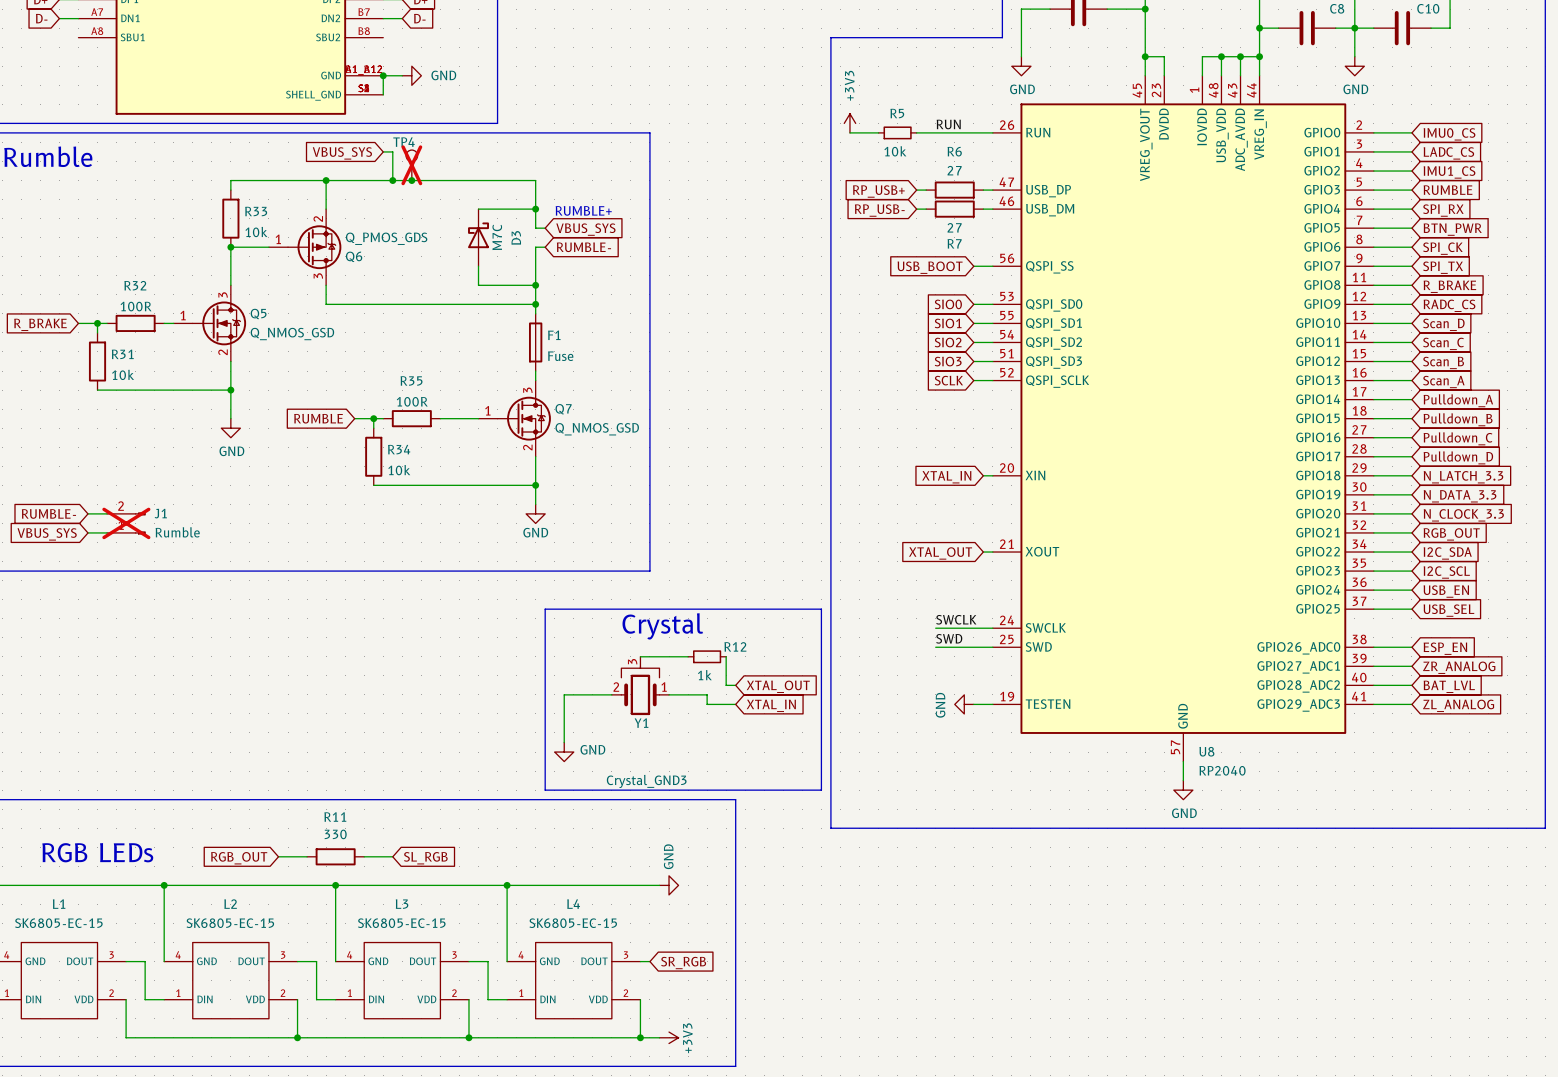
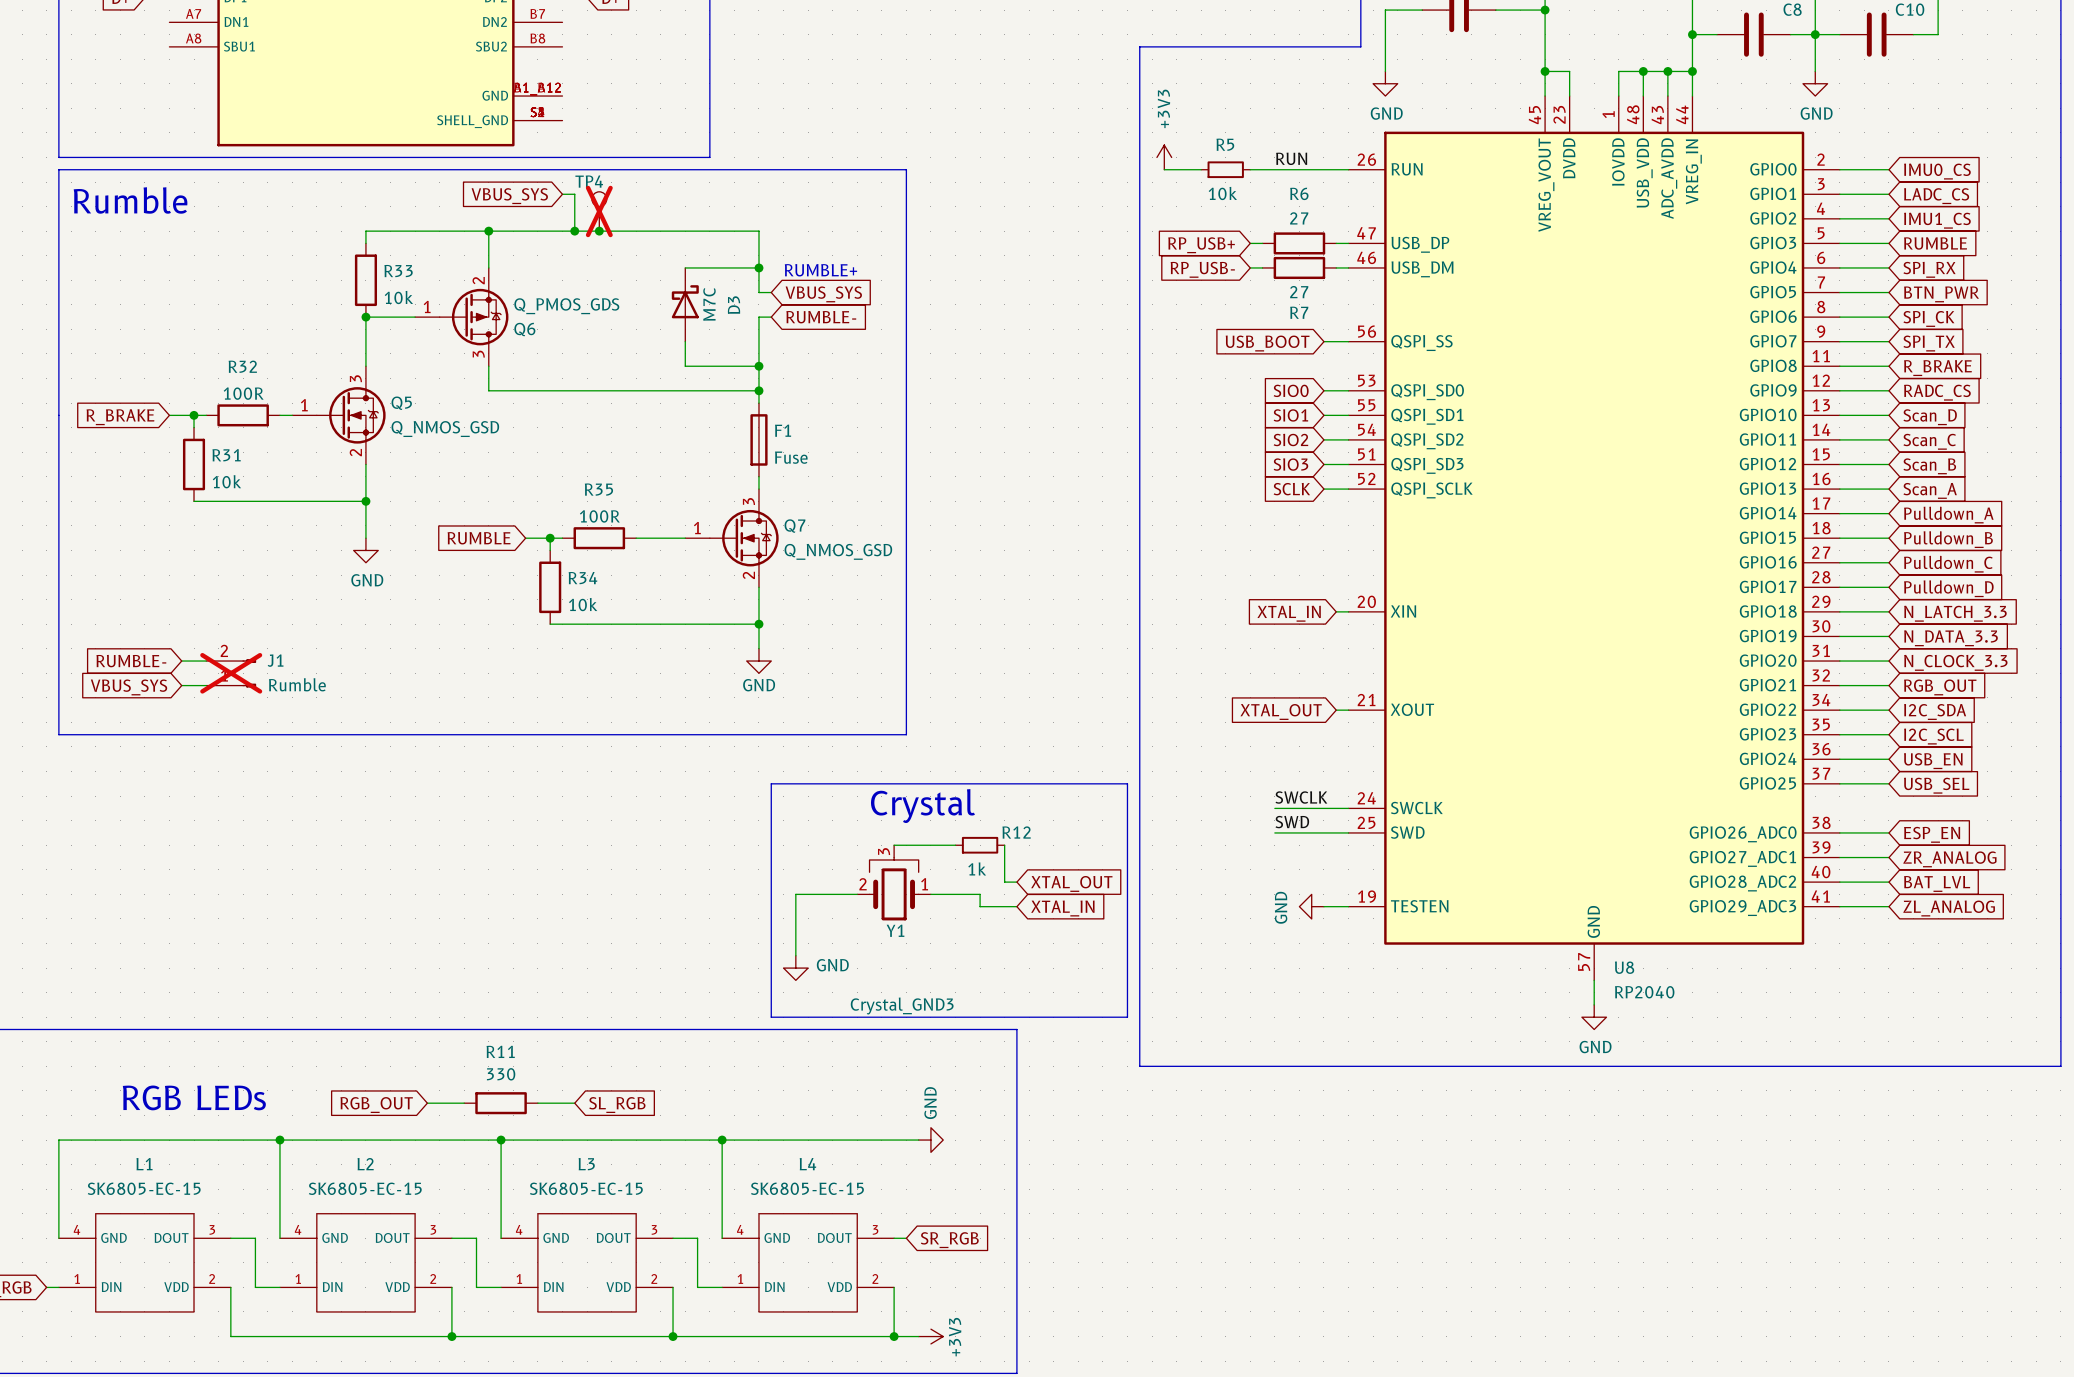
global label: D- (41, 18) -> none
wire: (59, 18) (78, 18) -> none
wire: (383, 18) (402, 18) -> none
global label: D- (419, 18) -> none
junction: (383, 75) -> none
wire: (402, 75) (383, 75) (383, 94) -> none
power symbol: GND (411, 75) -> none

